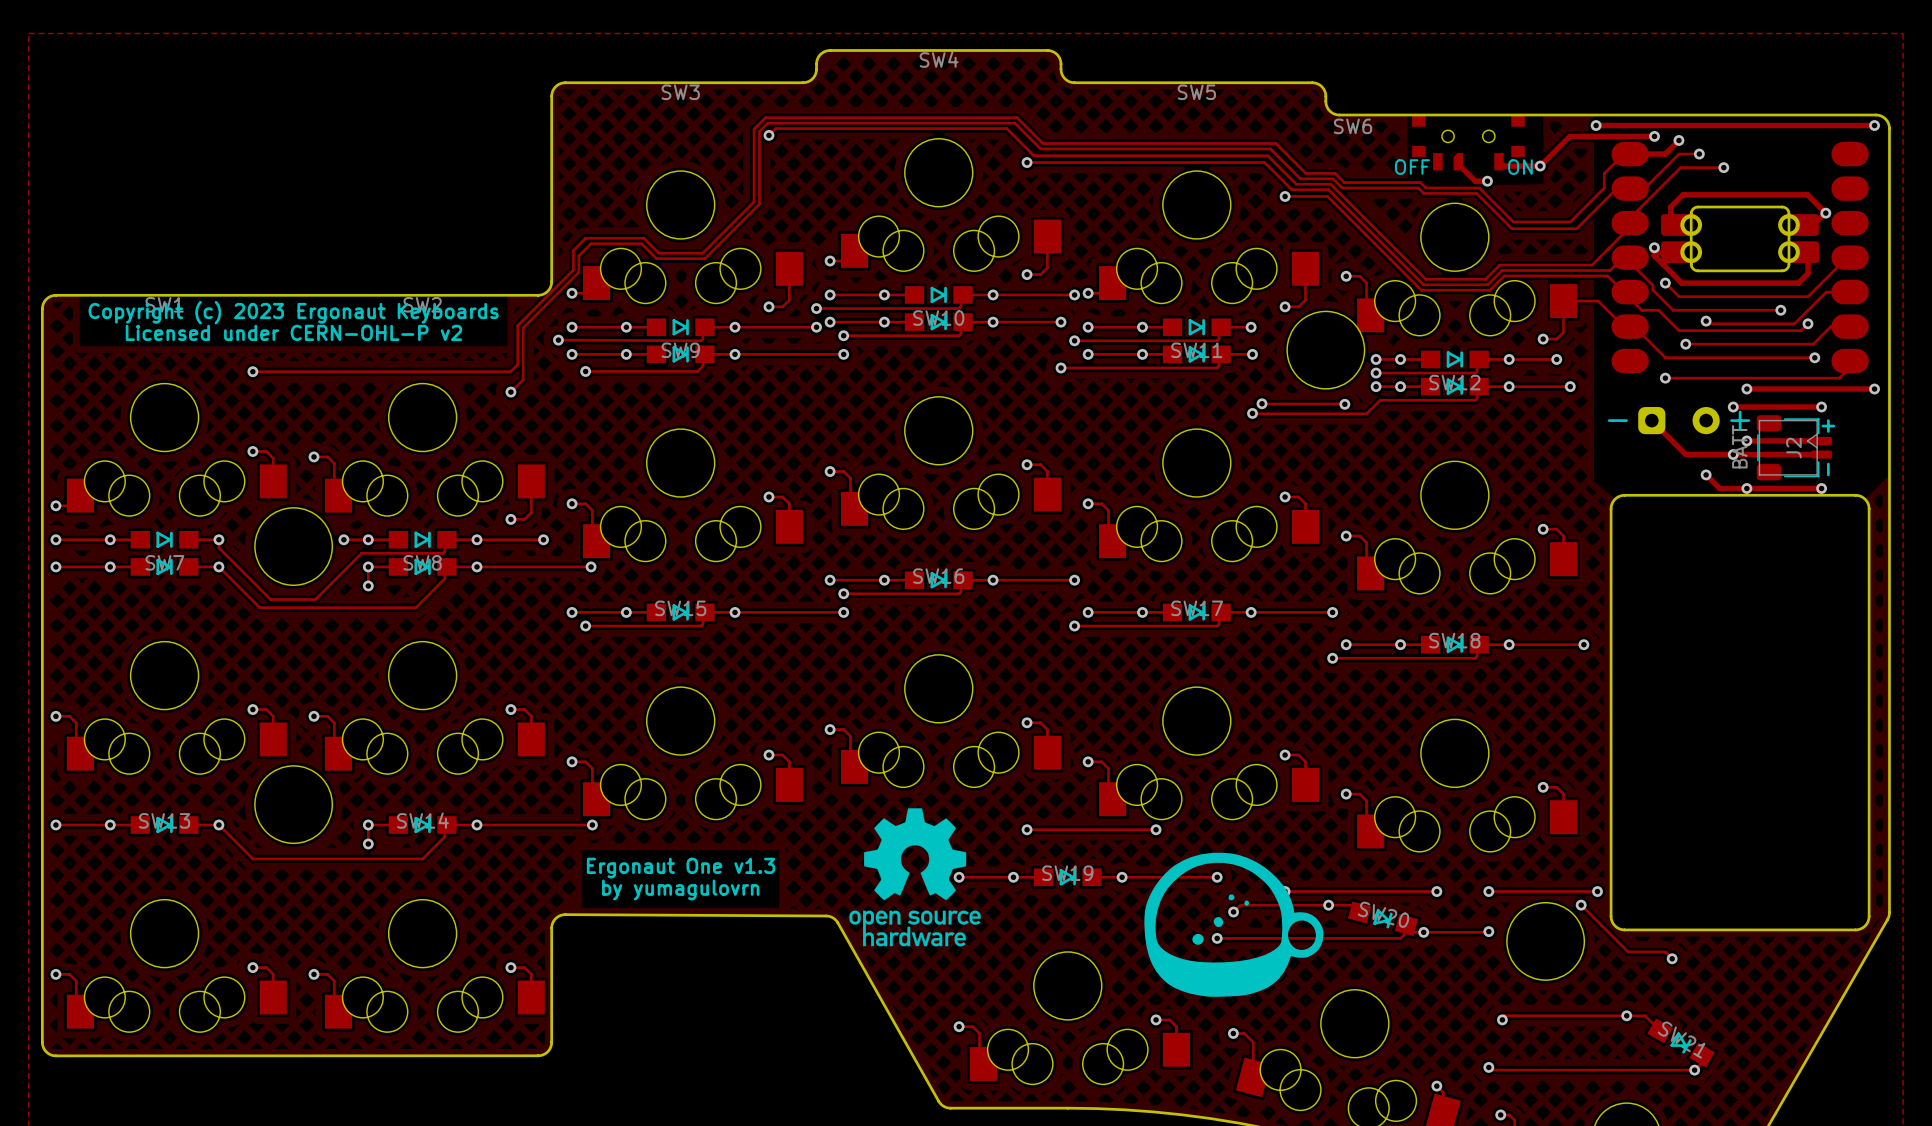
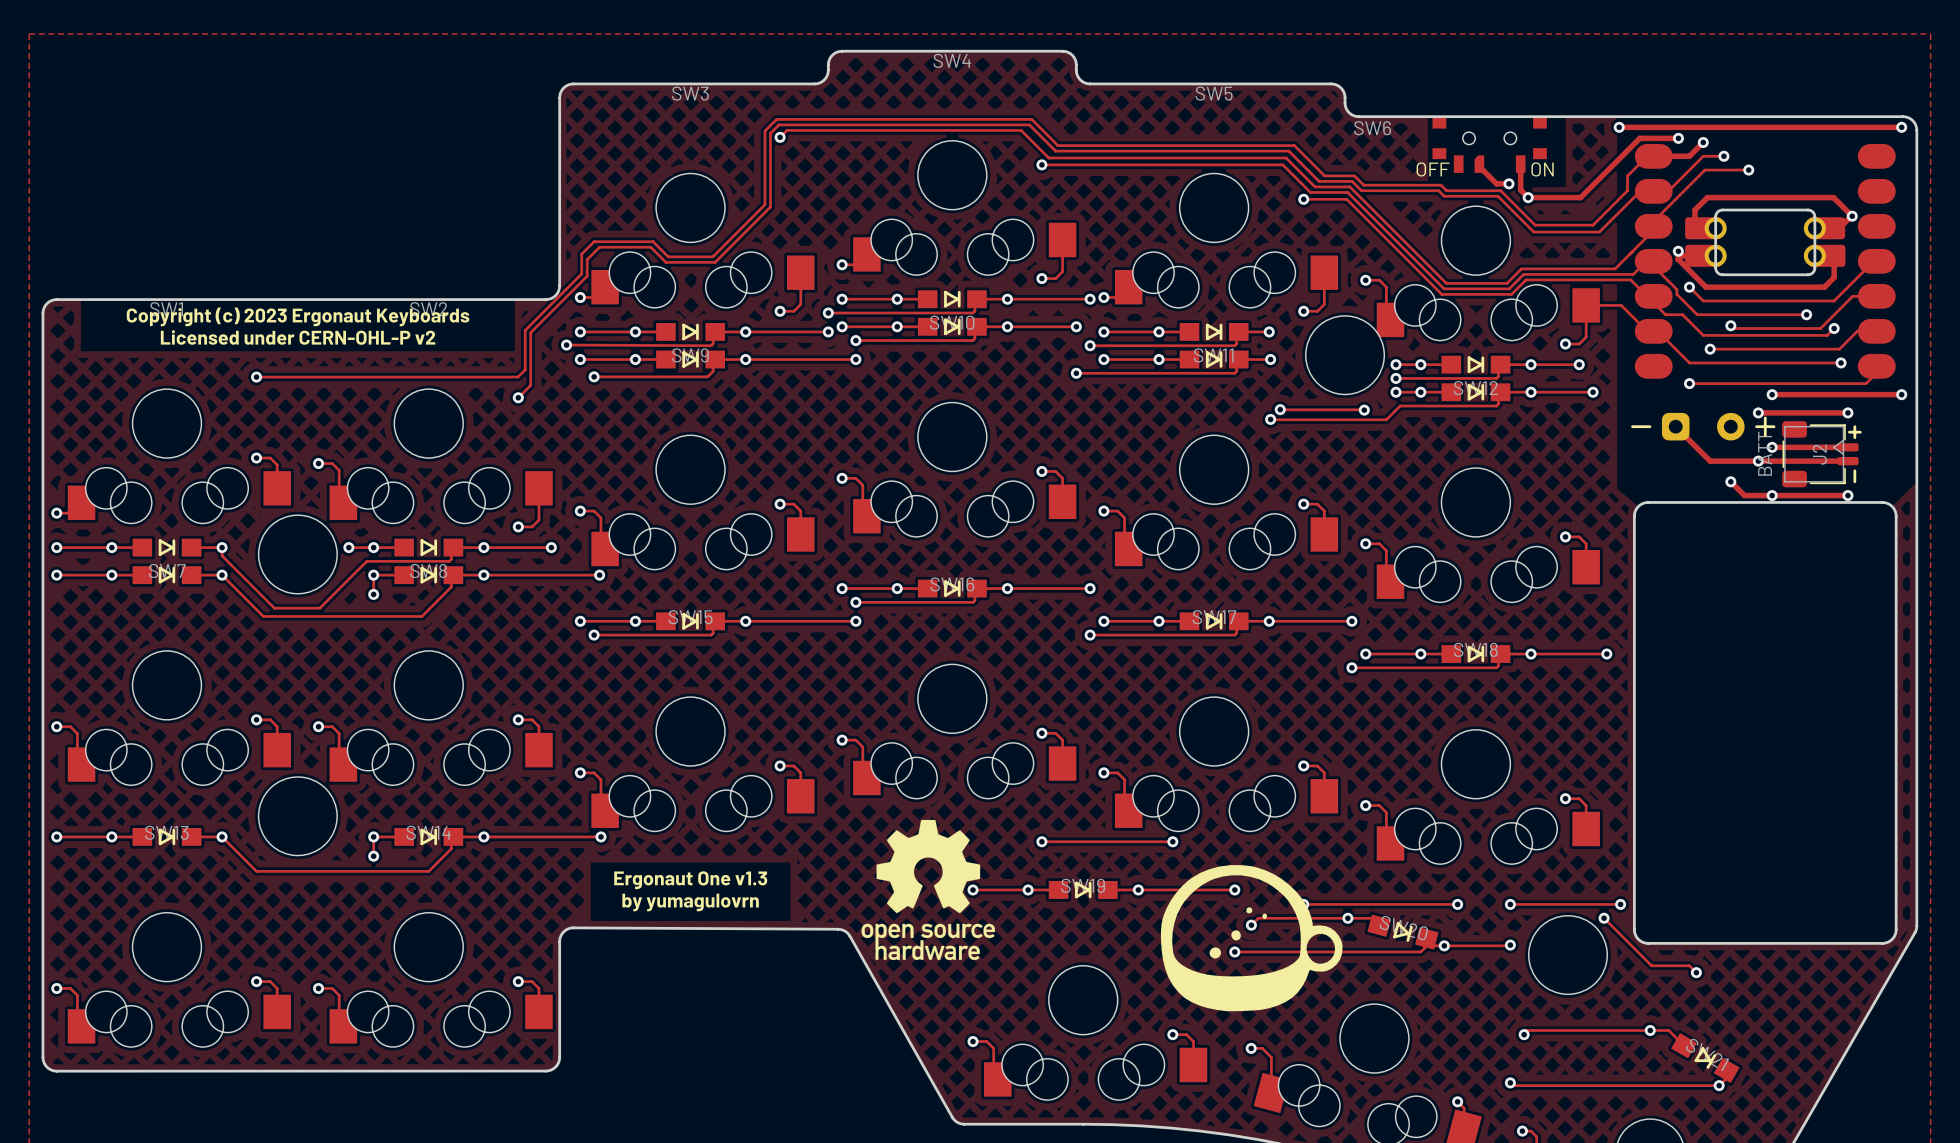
track: (1616, 136) (1569, 136) (1540, 166) (1503, 166) (1499, 161) -> (1639, 138) (1580, 197) (1528, 197) (1520, 190) (1520, 164)
via position: (1540, 166) -> (1528, 197)

